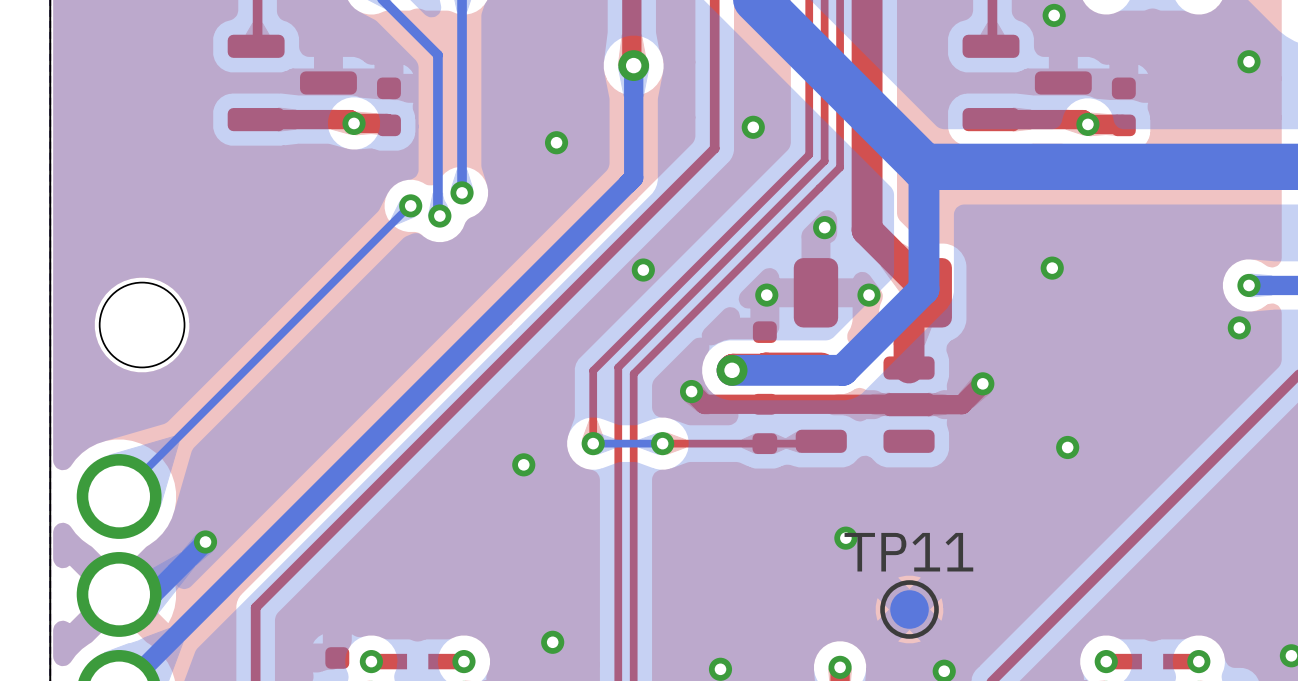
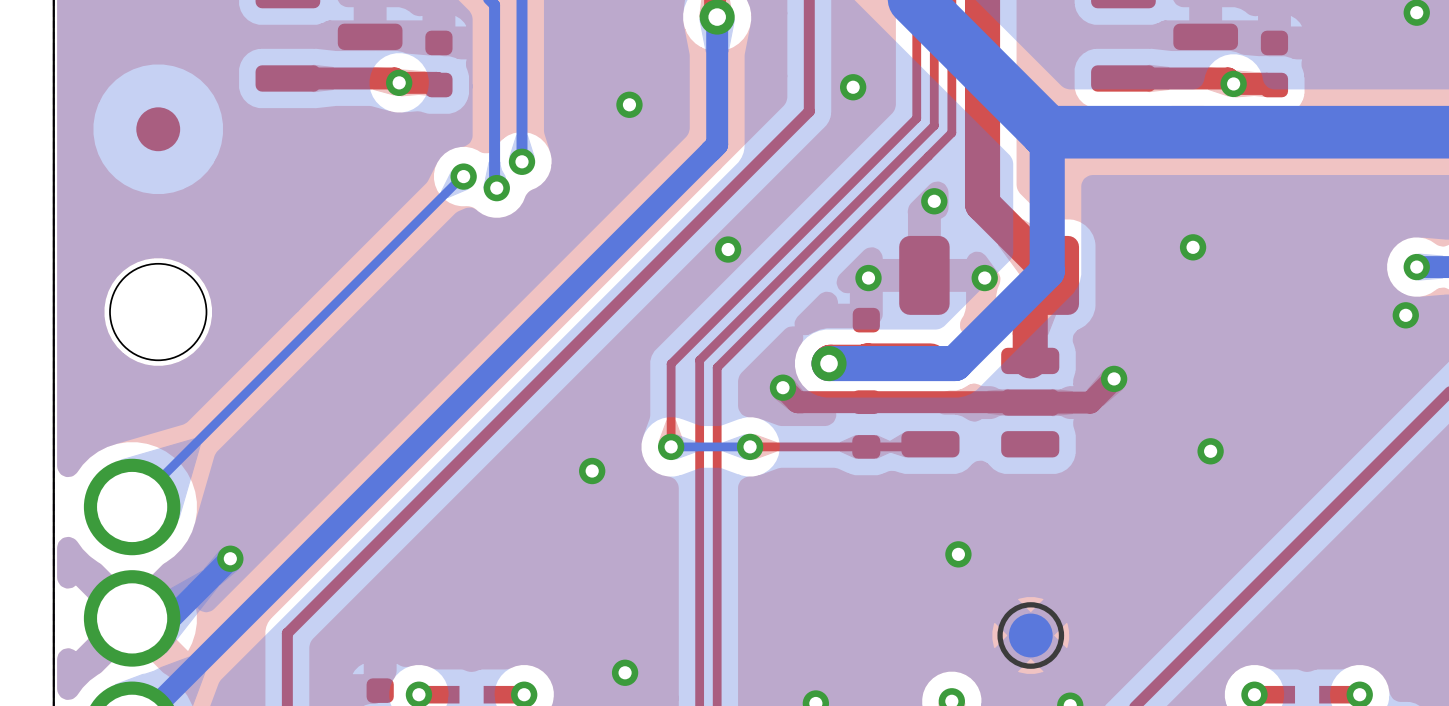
part: none -> (158, 129)
TP11 name: TP11 (908, 552) -> none

